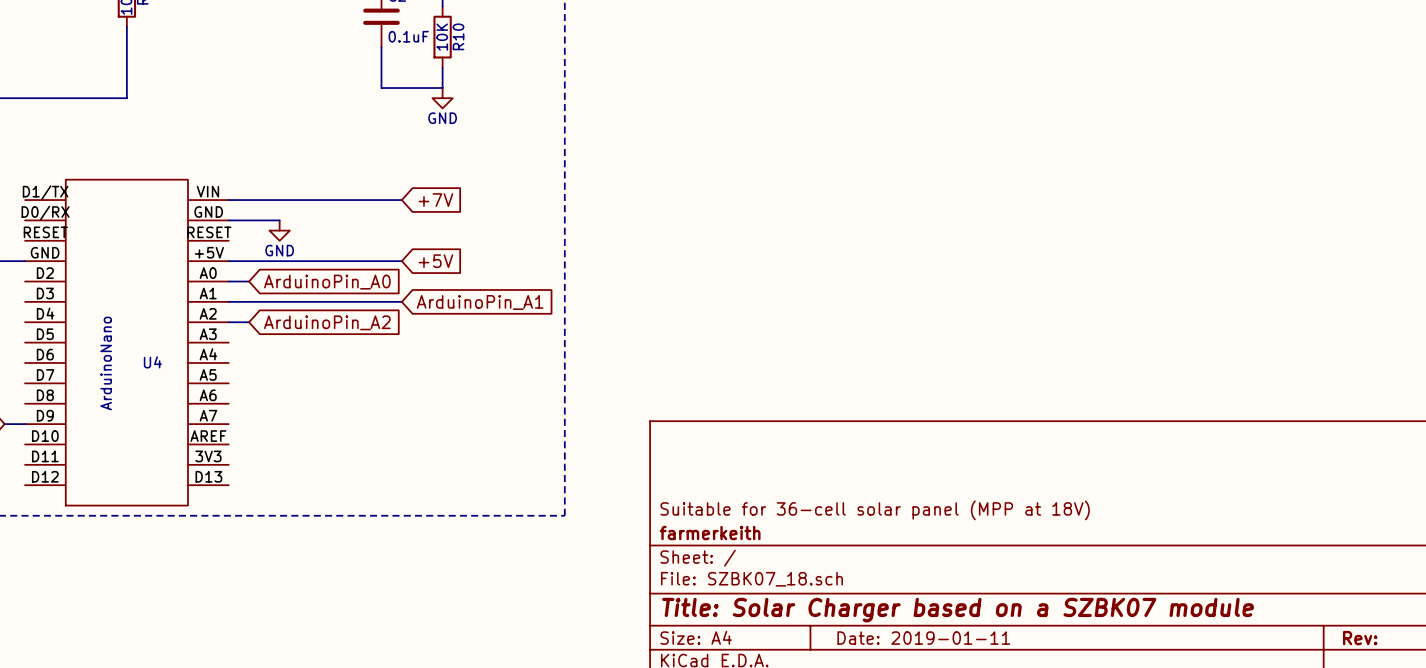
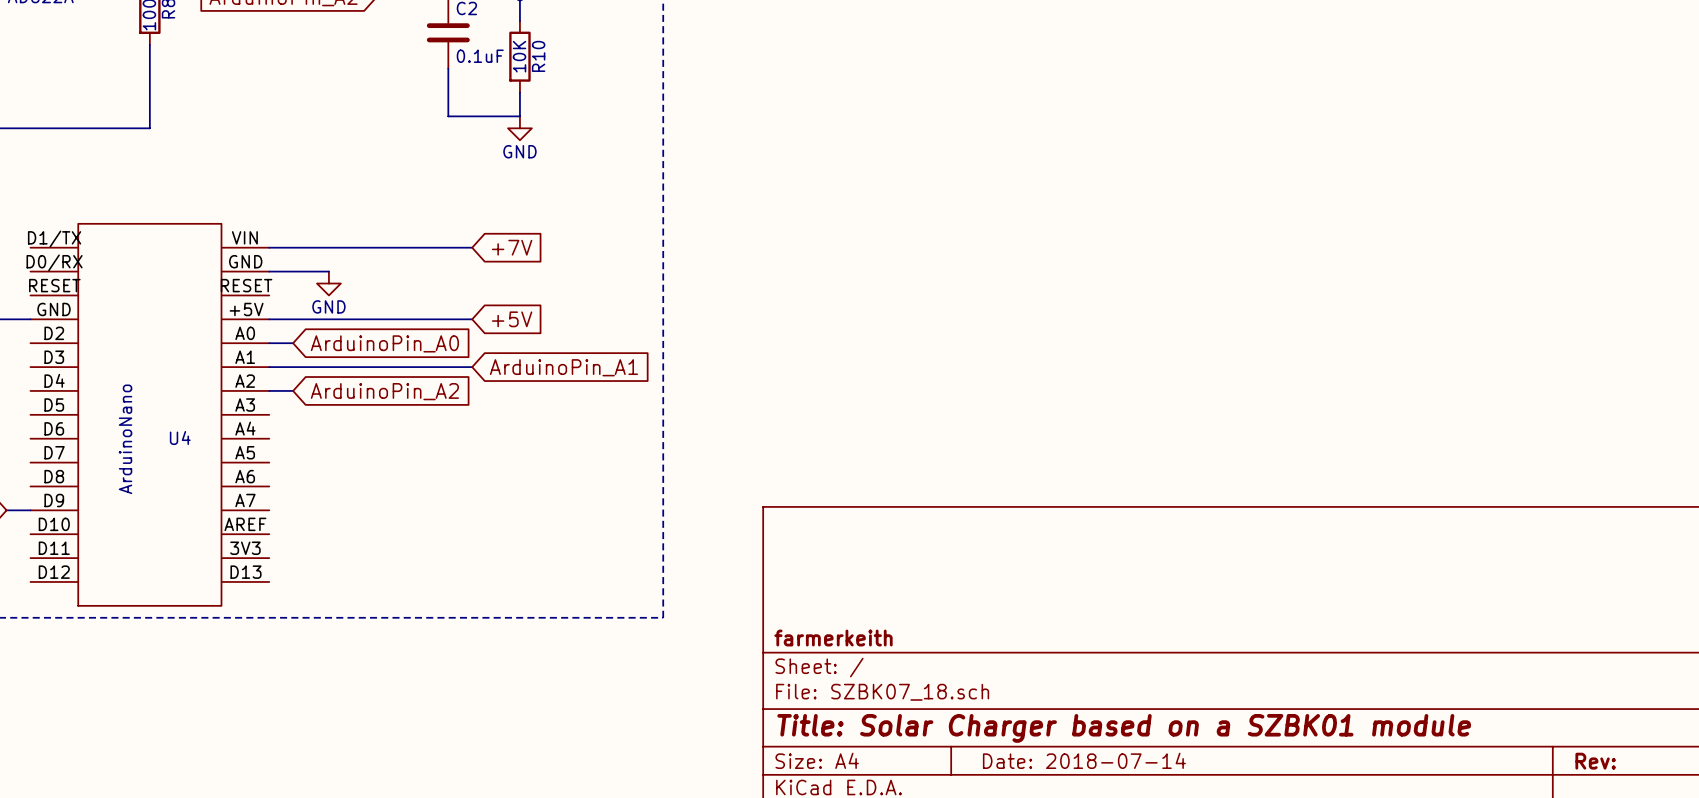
title block: Suitable for 36-cell solar panel (MPP at 18V) (875, 510) -> none
title block: Title: Solar Charger based on a SZBK07 module (958, 610) -> Title: Solar Charger based on a SZBK01 module (1124, 728)
title block: Date: 2019-01-11 (923, 638) -> Date: 2018-07-14 (1084, 760)

